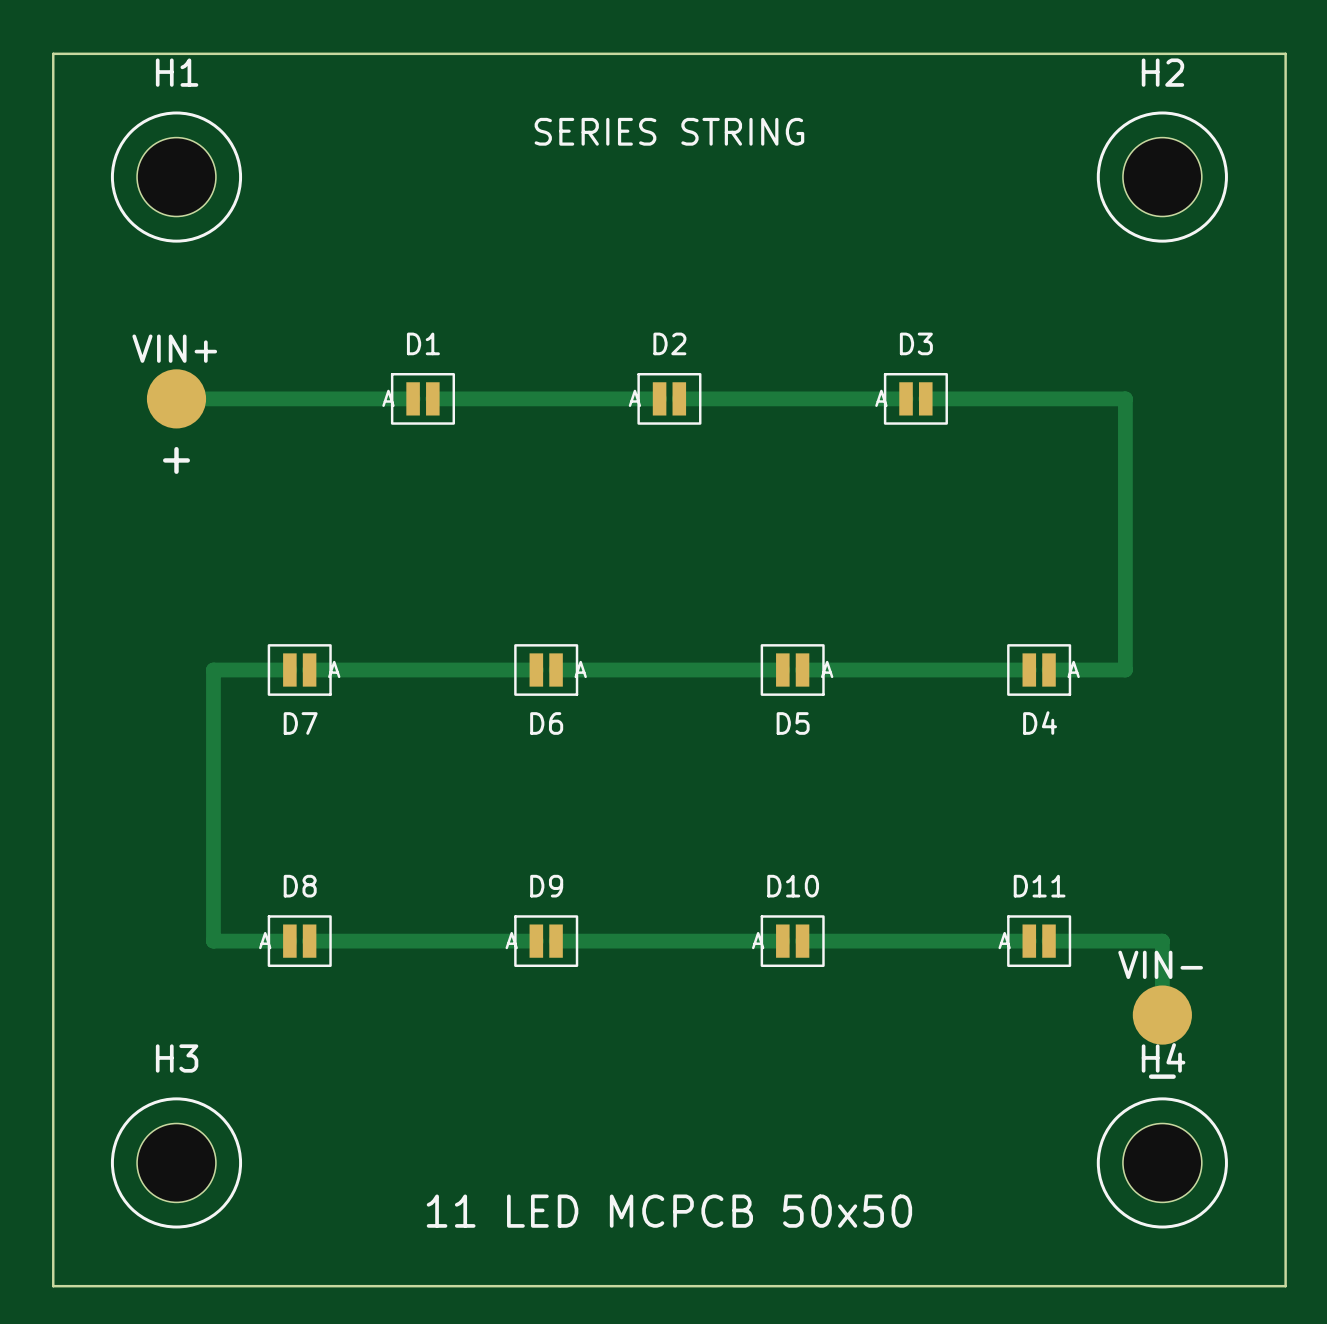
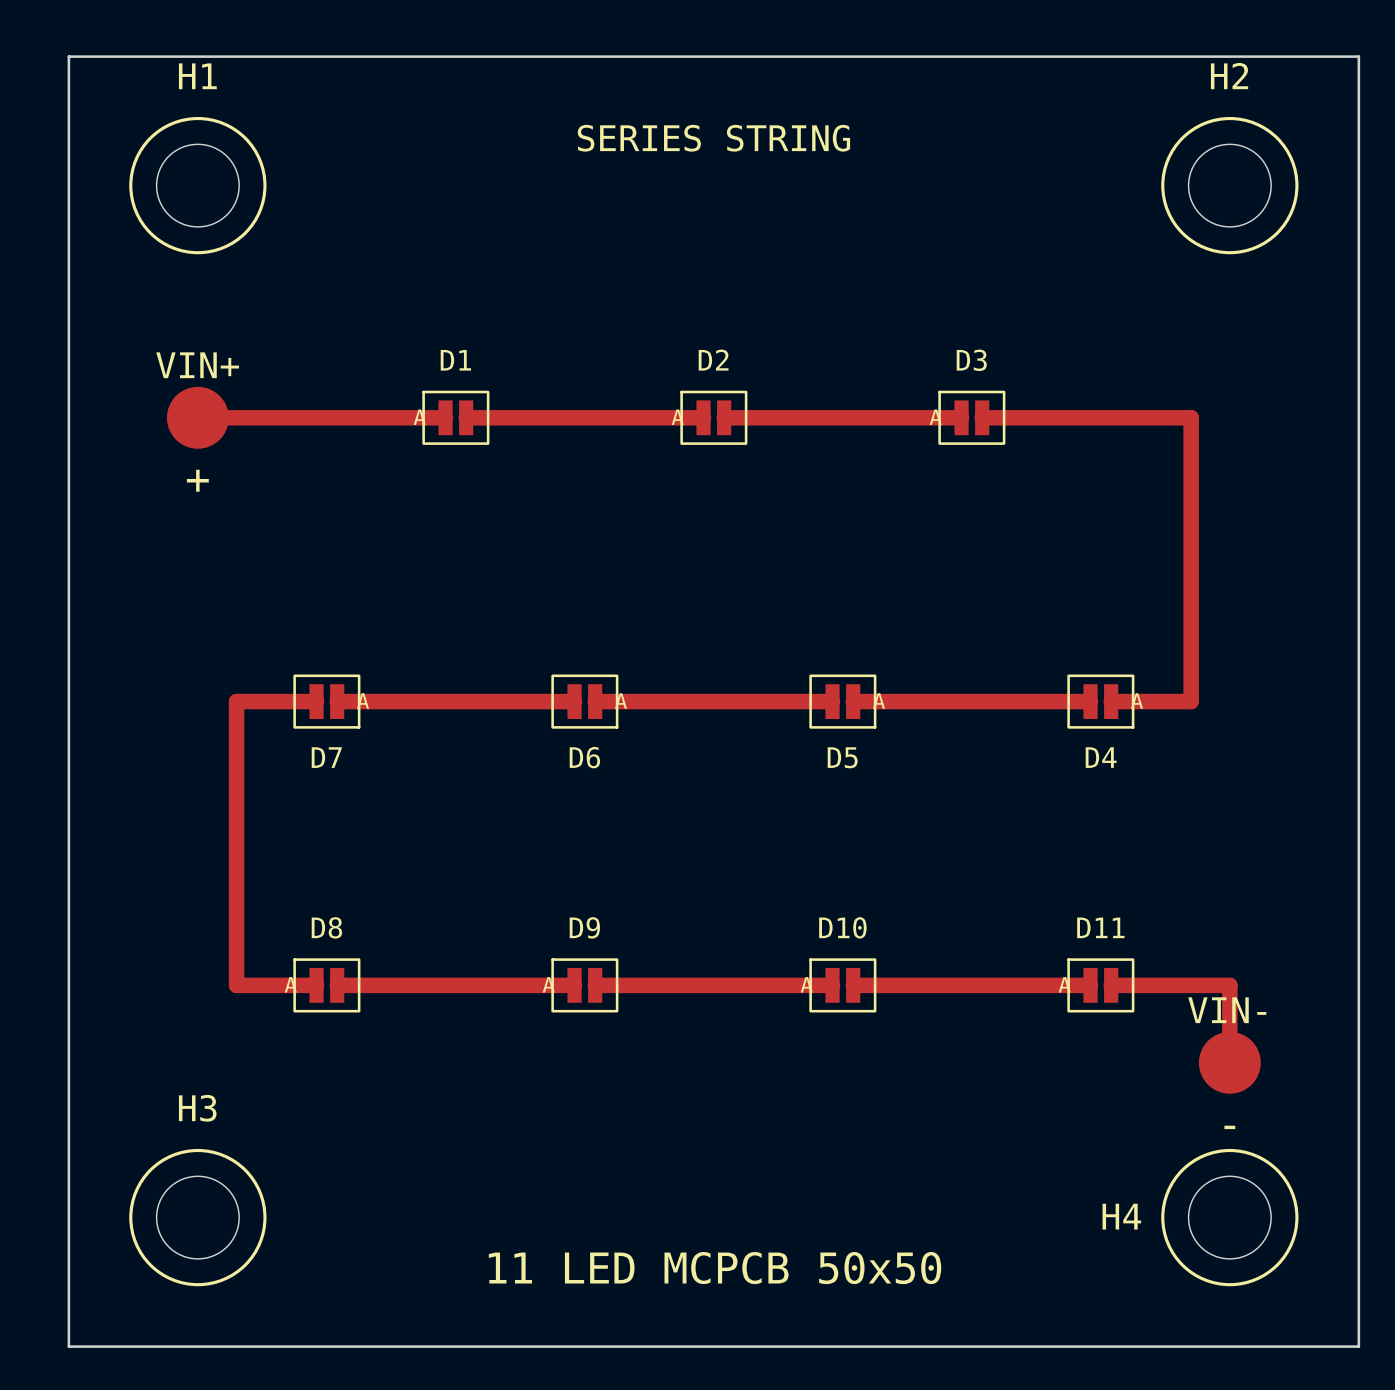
H4 name position: H4 (1163, 1057) -> H4 (1121, 1216)

